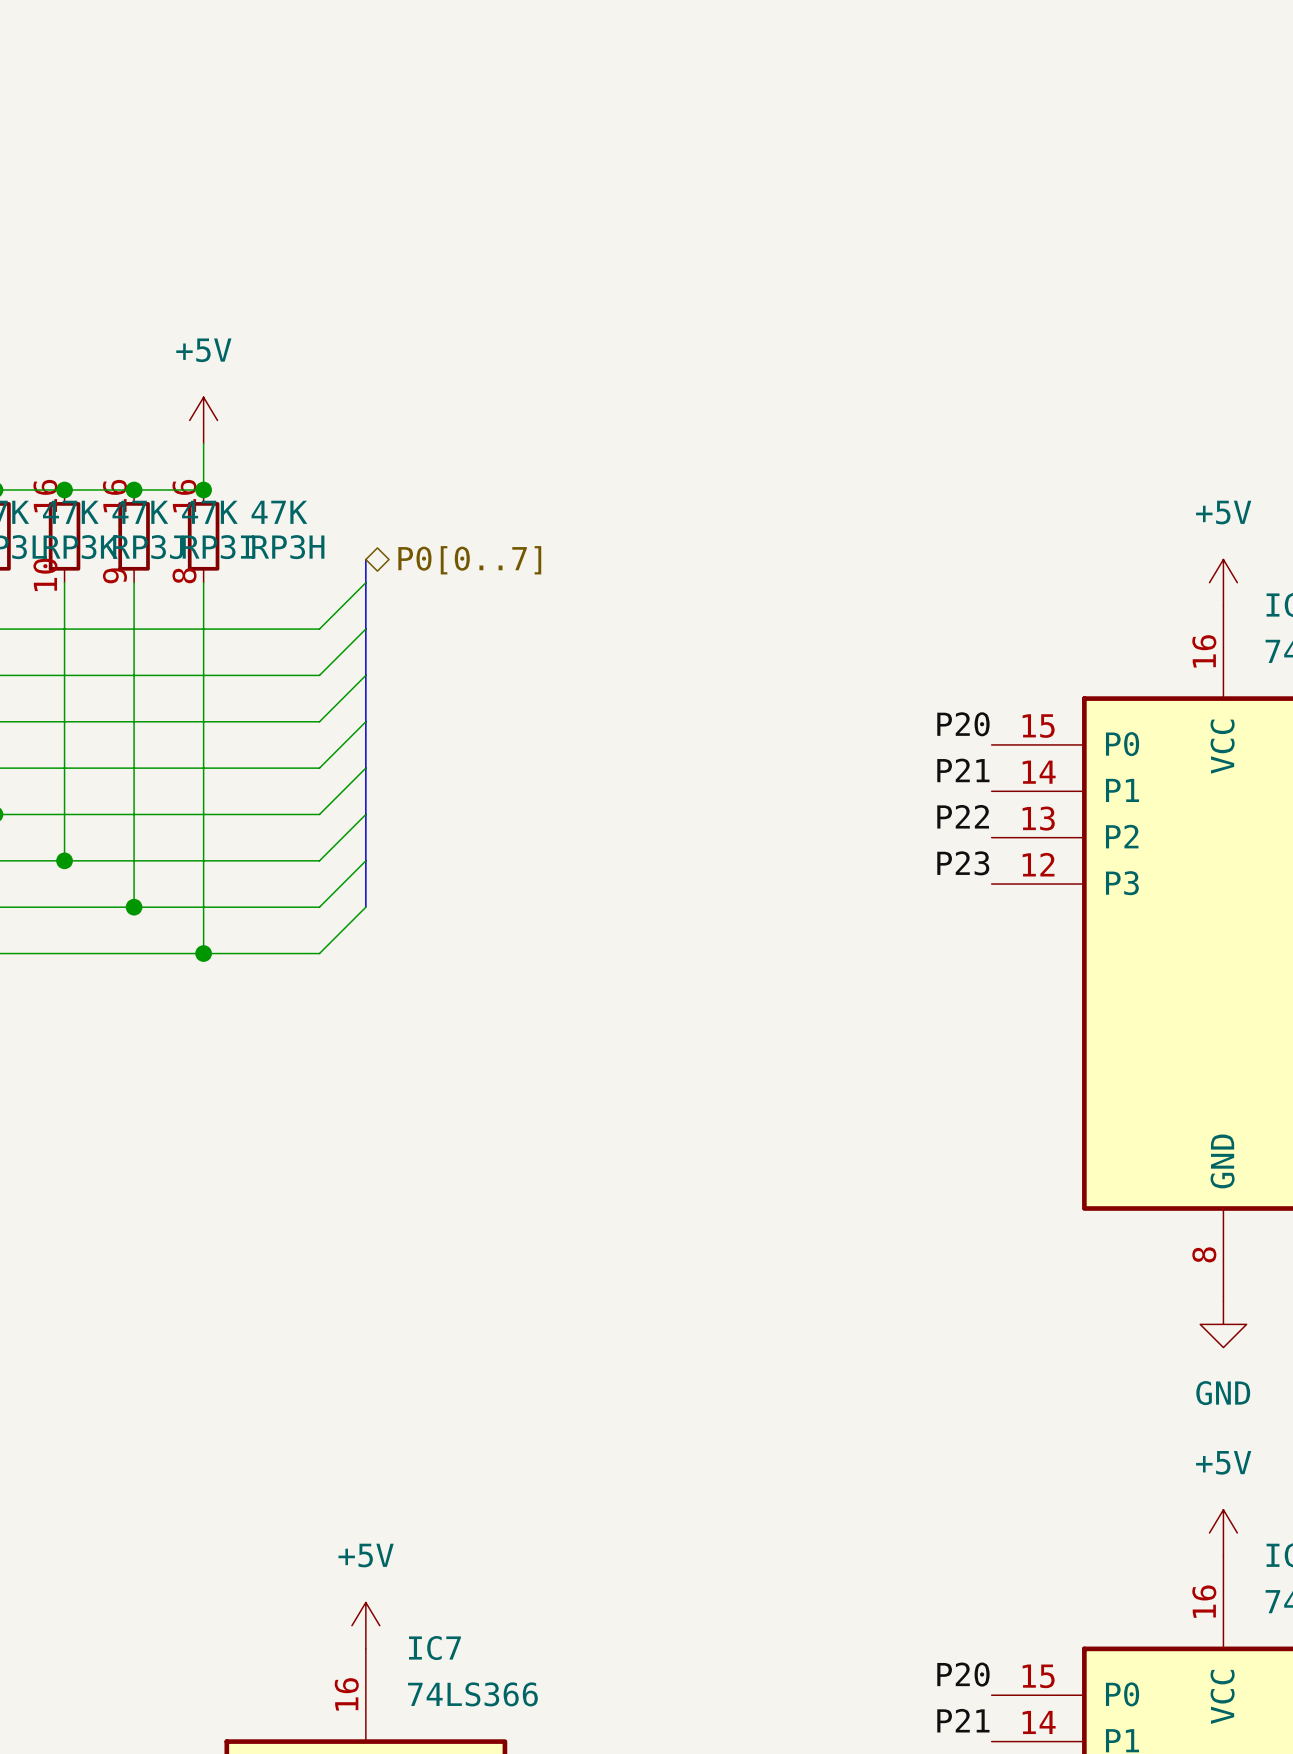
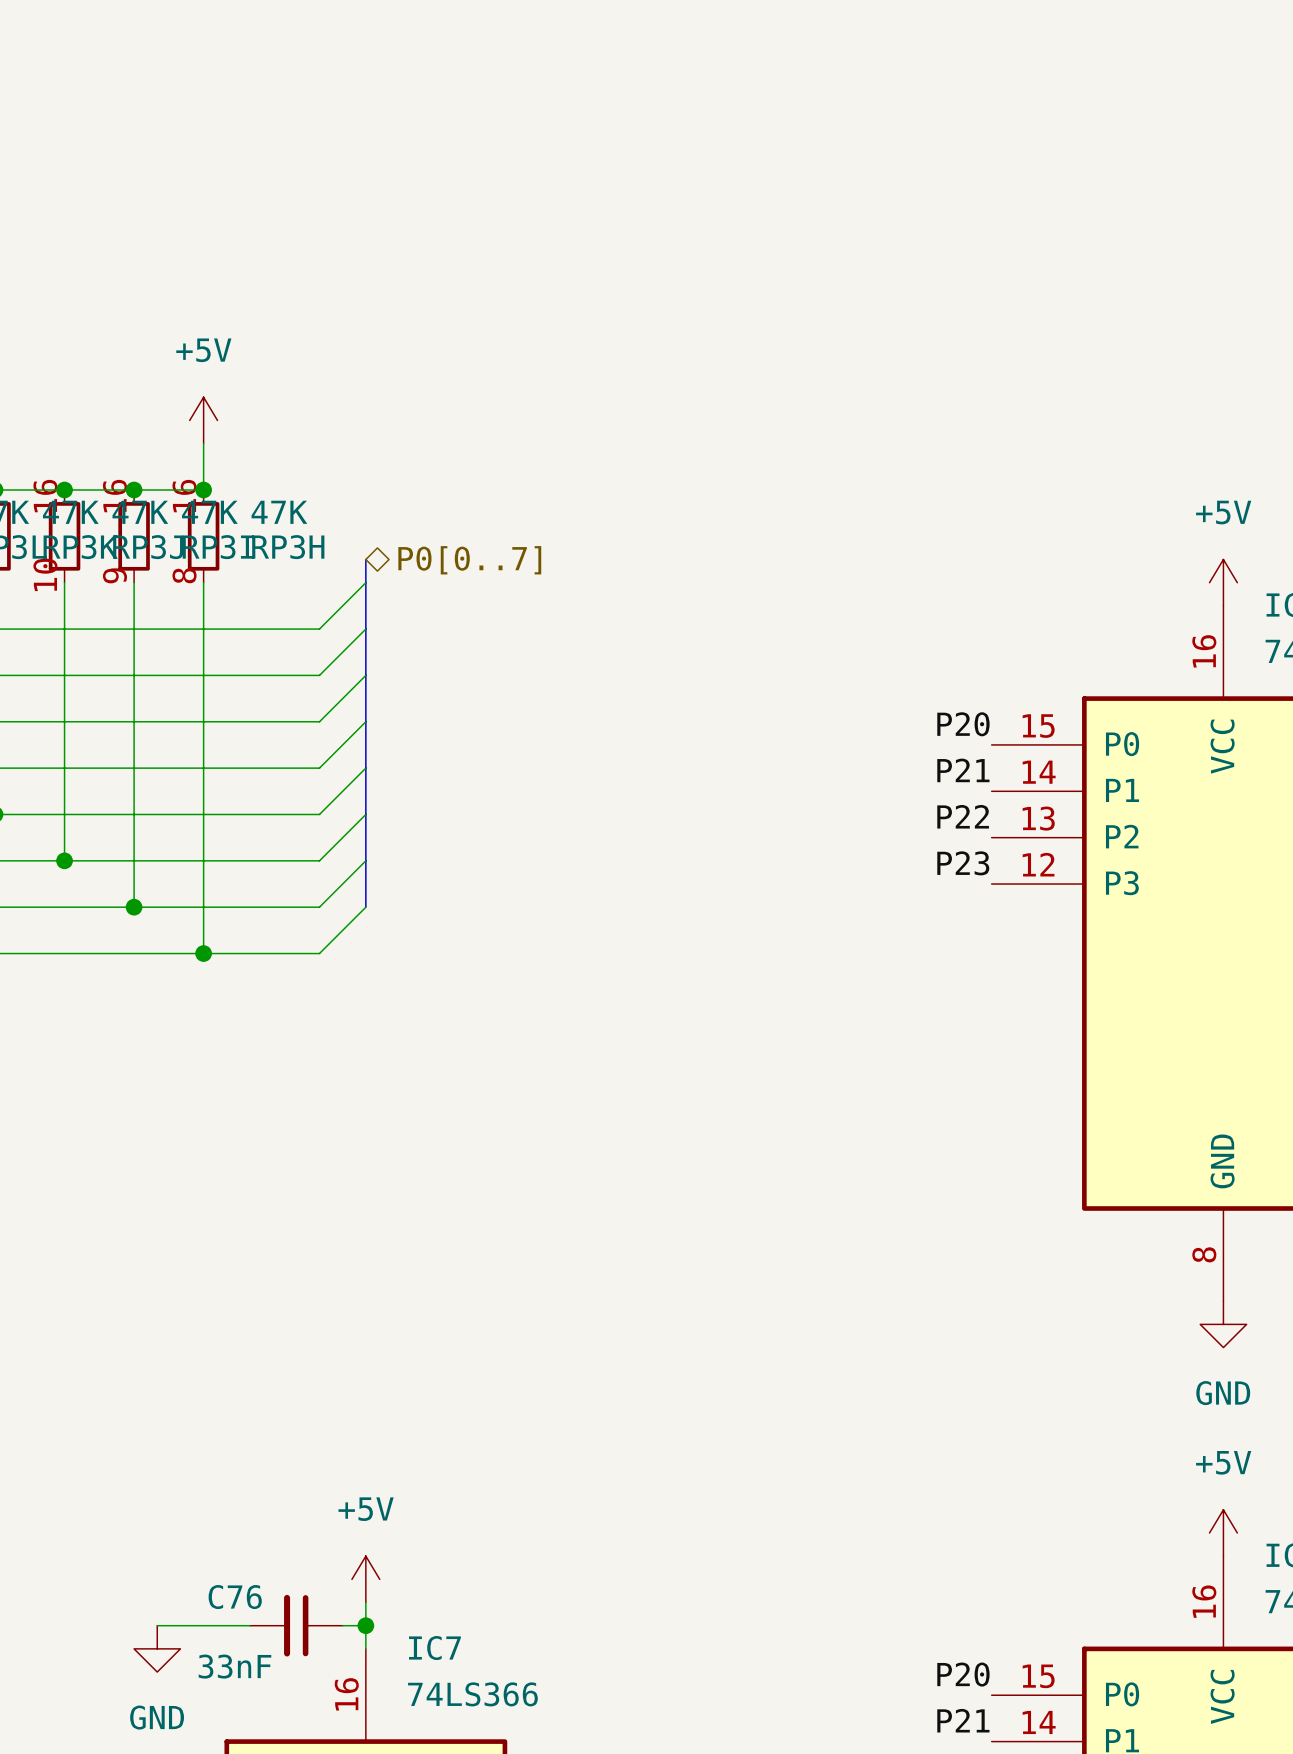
wire: none -> (157, 1625) (249, 1625)
C76: none -> 33nF (296, 1625)
wire: none -> (342, 1625) (365, 1625)
power symbol position: +5V (365, 1625) -> +5V (365, 1579)
junction: none -> (365, 1625)
power symbol: none -> GND (157, 1648)

